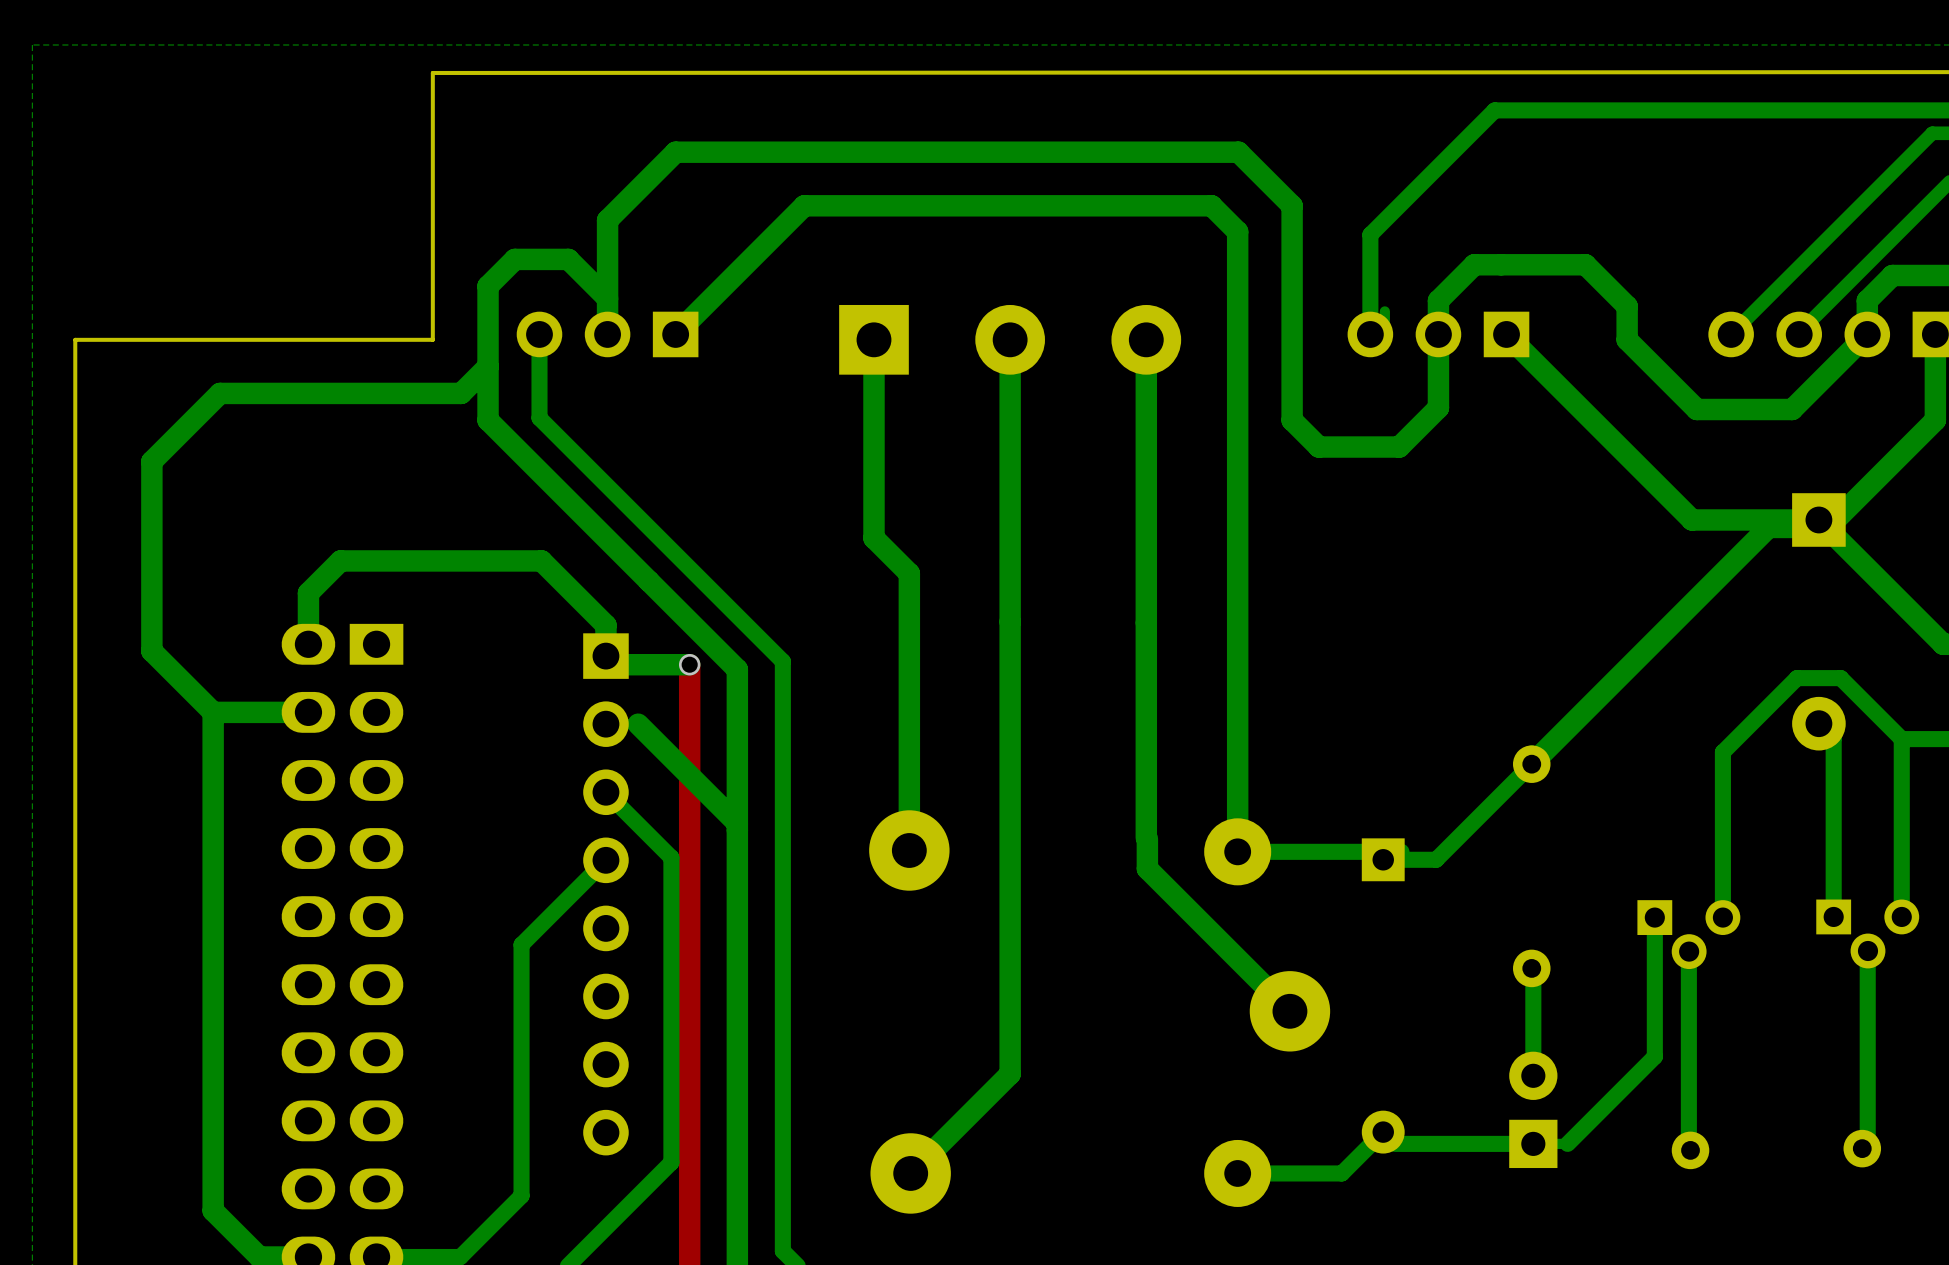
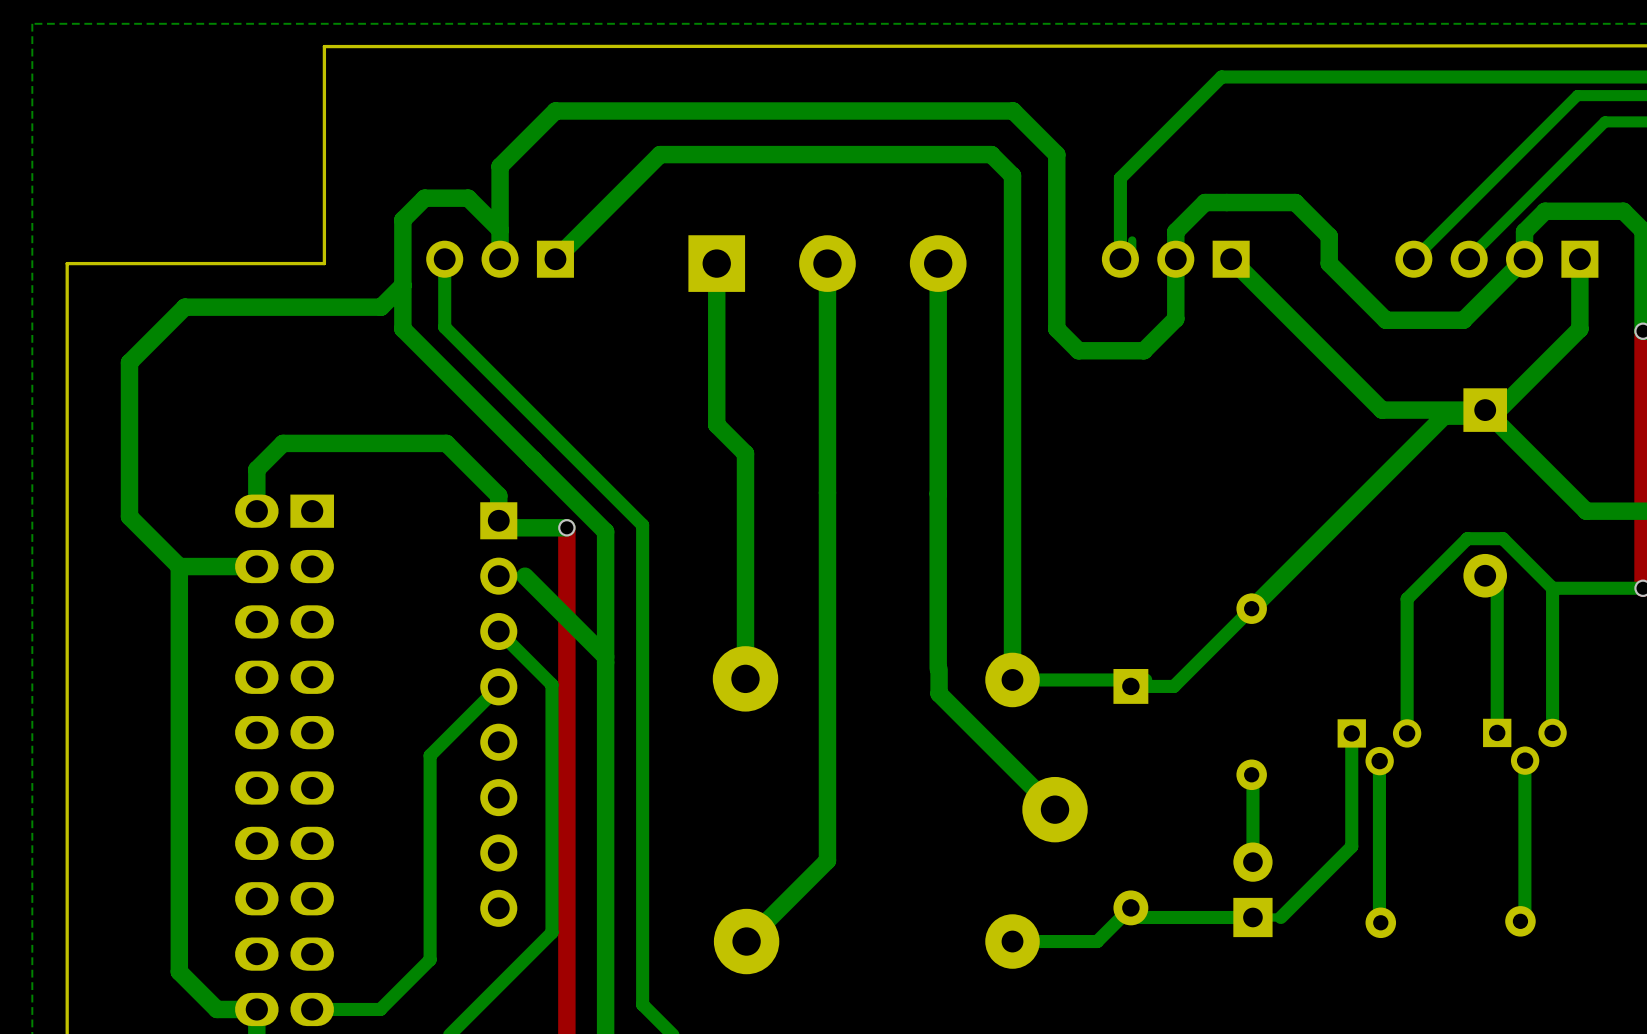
board edge: (432, 72) (432, 339) (391, 339) -> (357, 46) (324, 46) (324, 263)

